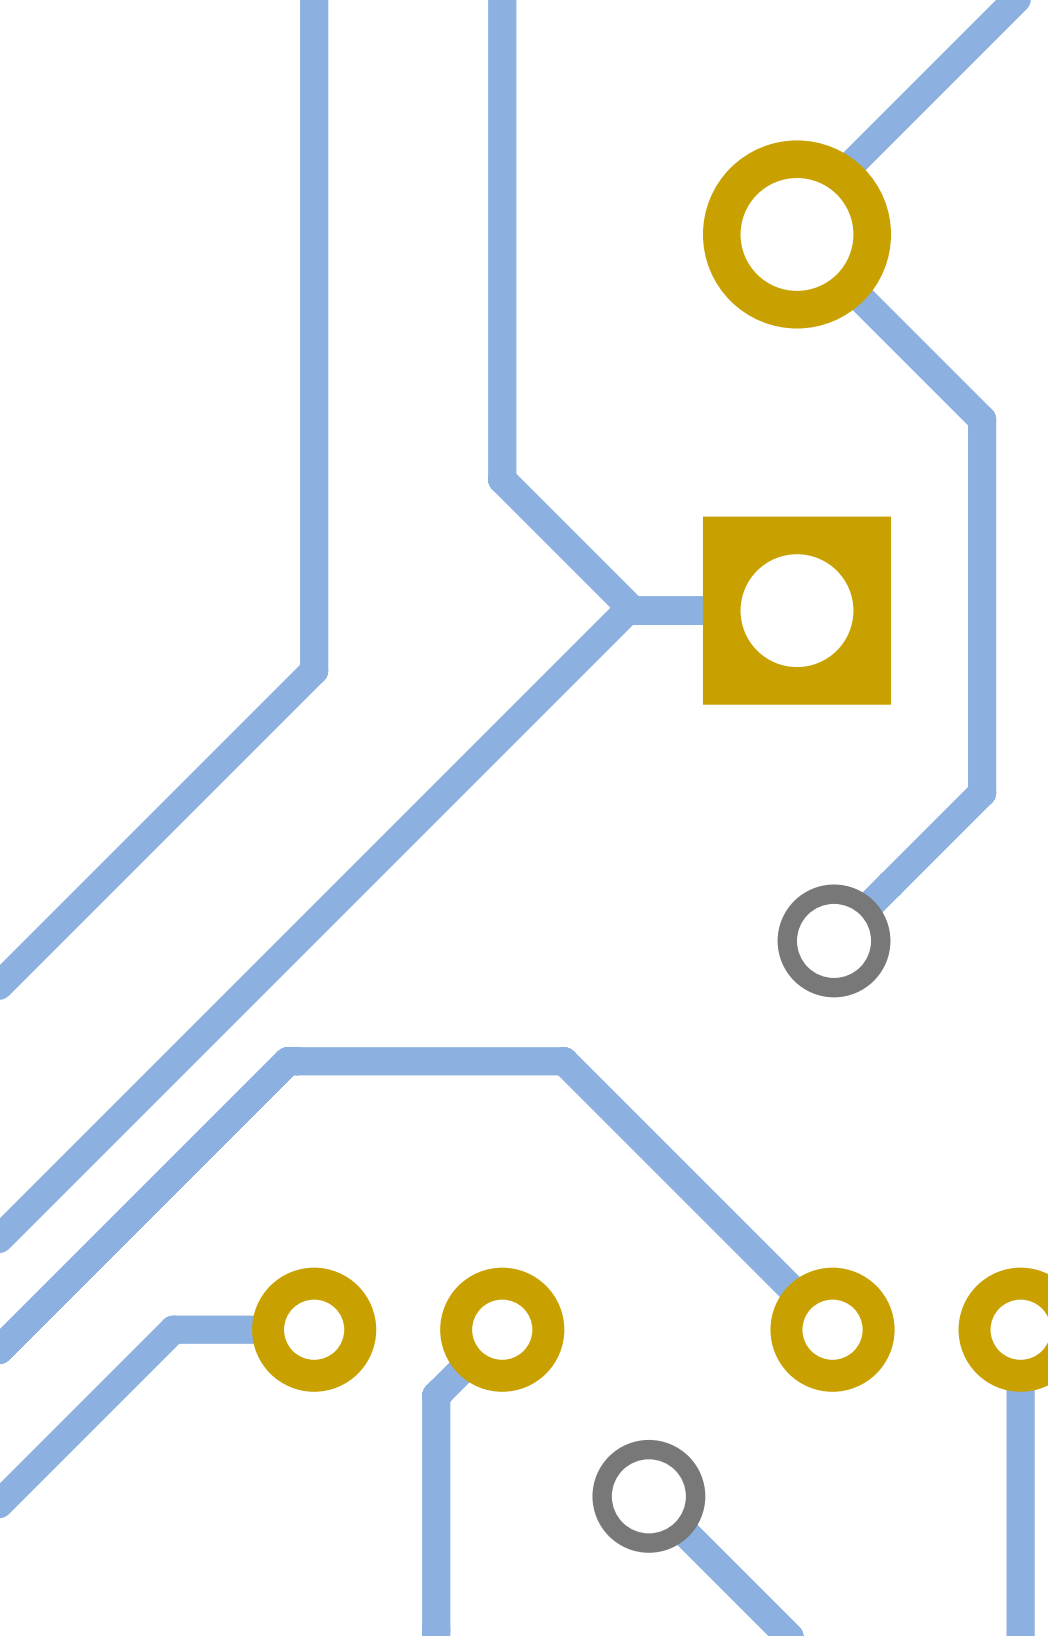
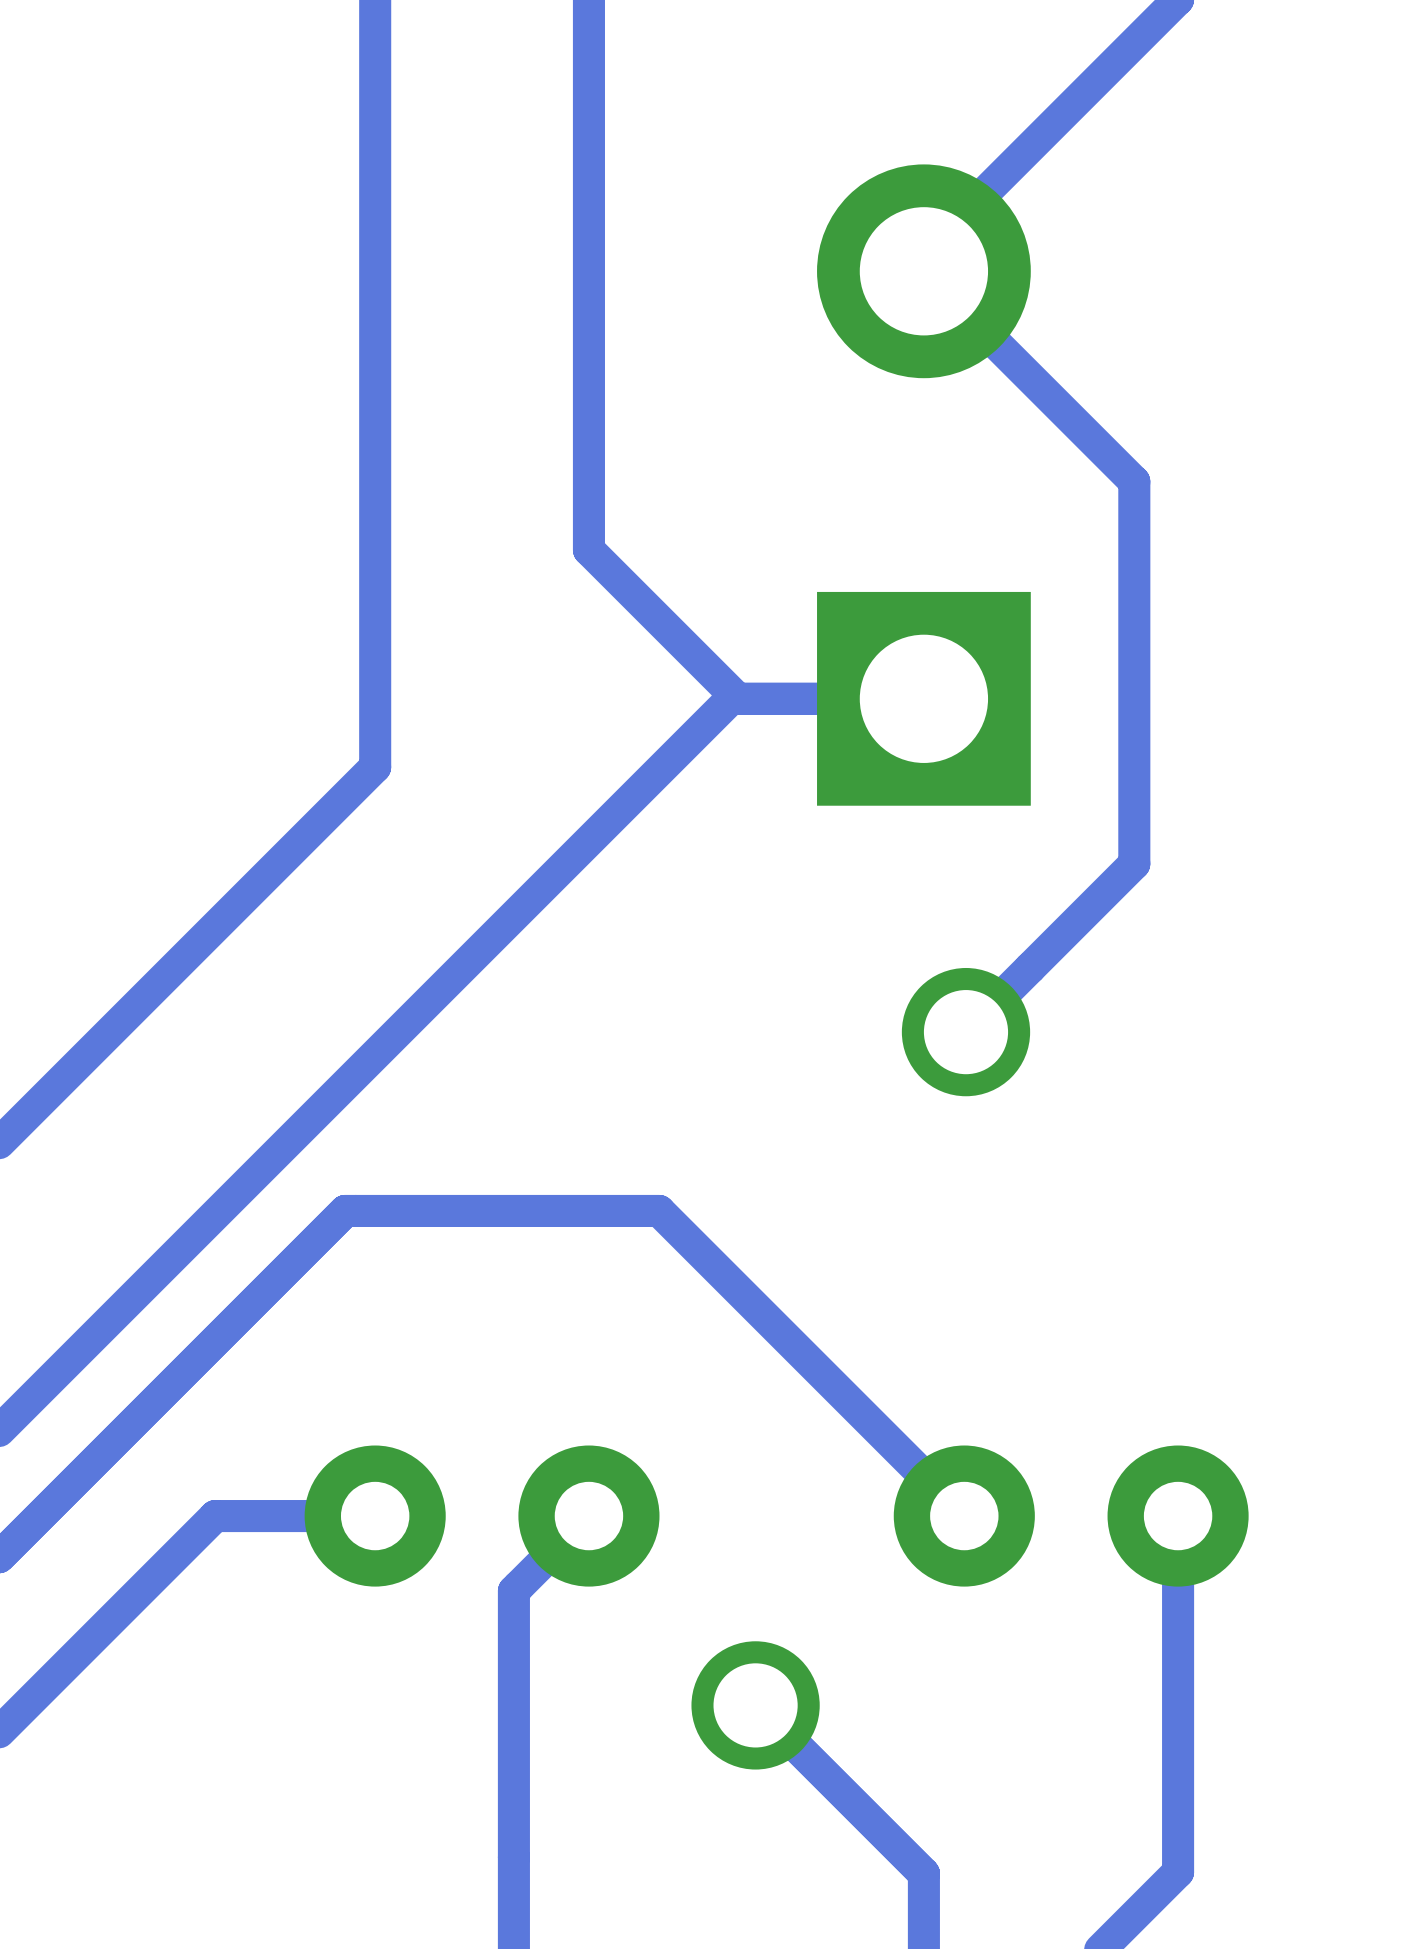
track: (982, 755) (982, 792) (834, 940) -> (1134, 863) (965, 1032)
via position: (834, 940) -> (965, 1032)

